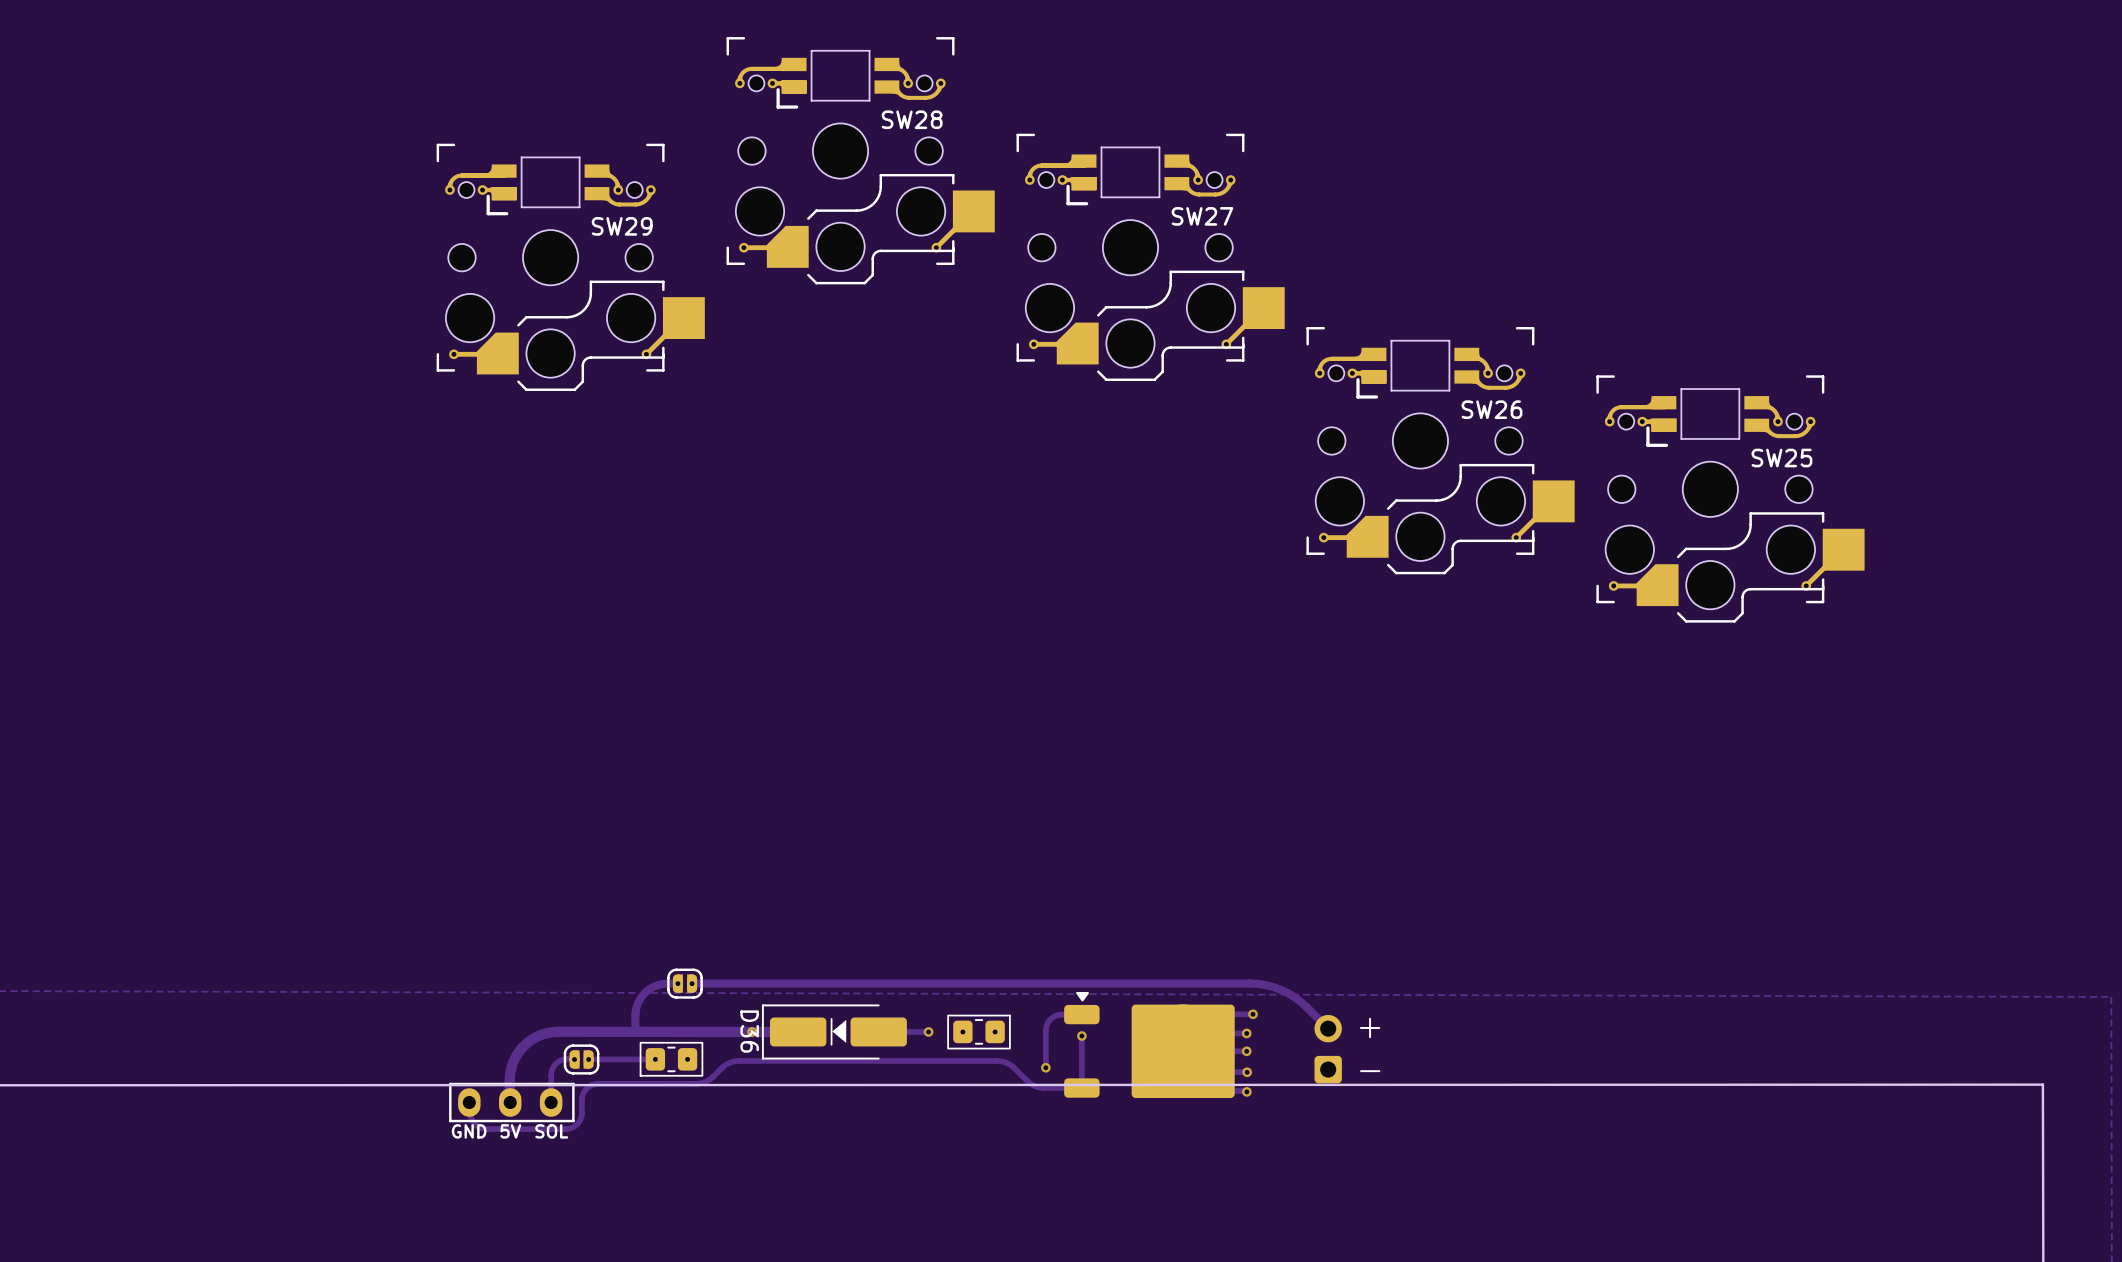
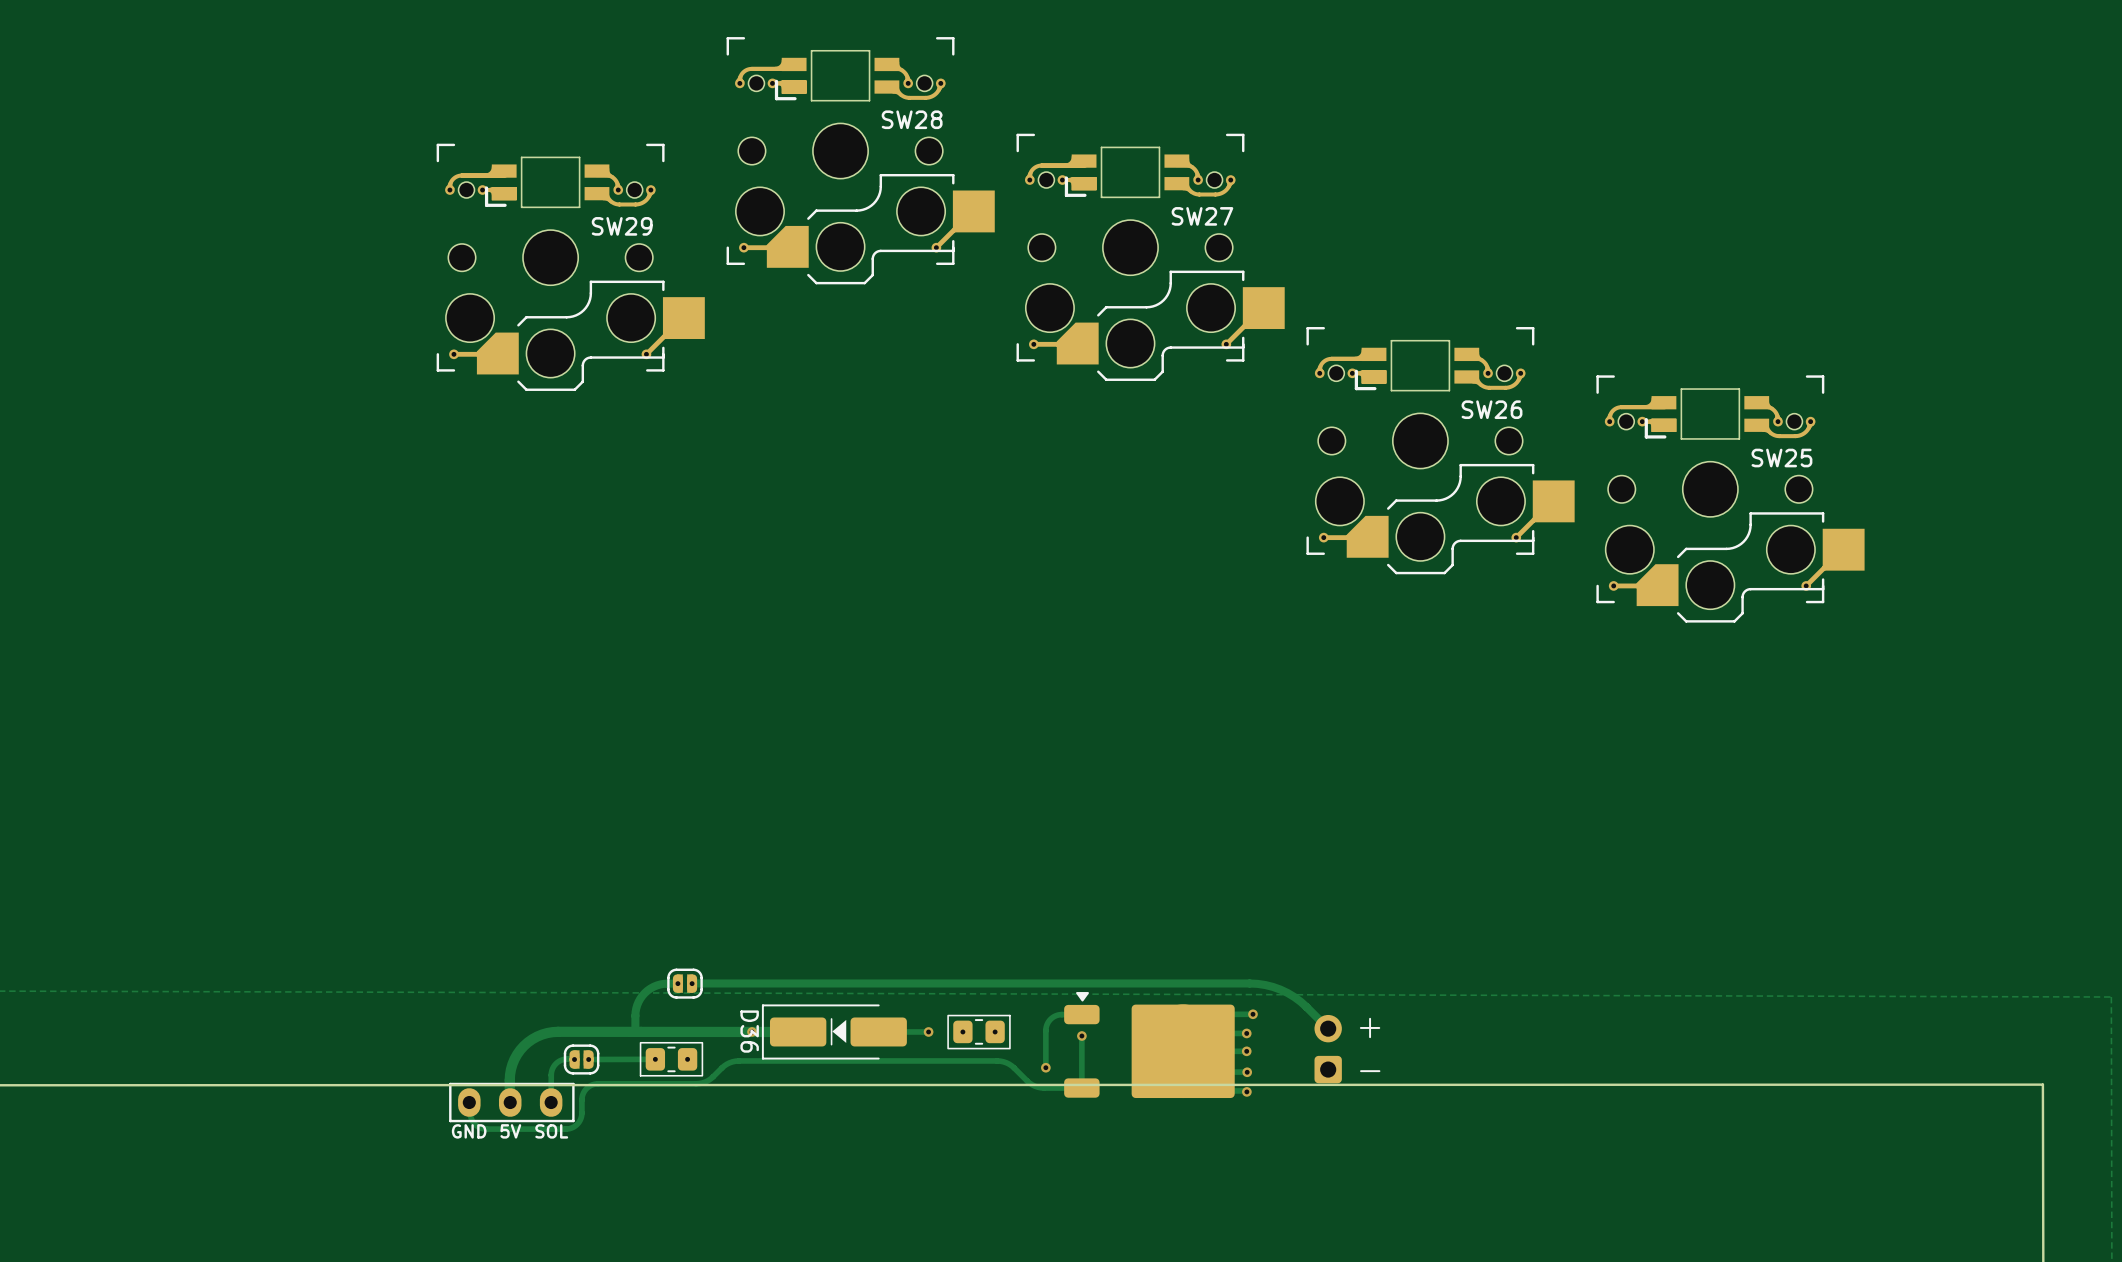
SW28 footprint: [726, 37, 995, 285] -> [726, 37, 995, 285]
SW27 footprint: [1016, 133, 1285, 381] -> [1016, 133, 1285, 381]
SW29 footprint: [436, 143, 705, 391] -> [436, 143, 705, 391]
SW26 footprint: [1306, 327, 1575, 575] -> [1306, 327, 1575, 575]
SW25 footprint: [1596, 375, 1865, 623] -> [1596, 375, 1865, 623]

